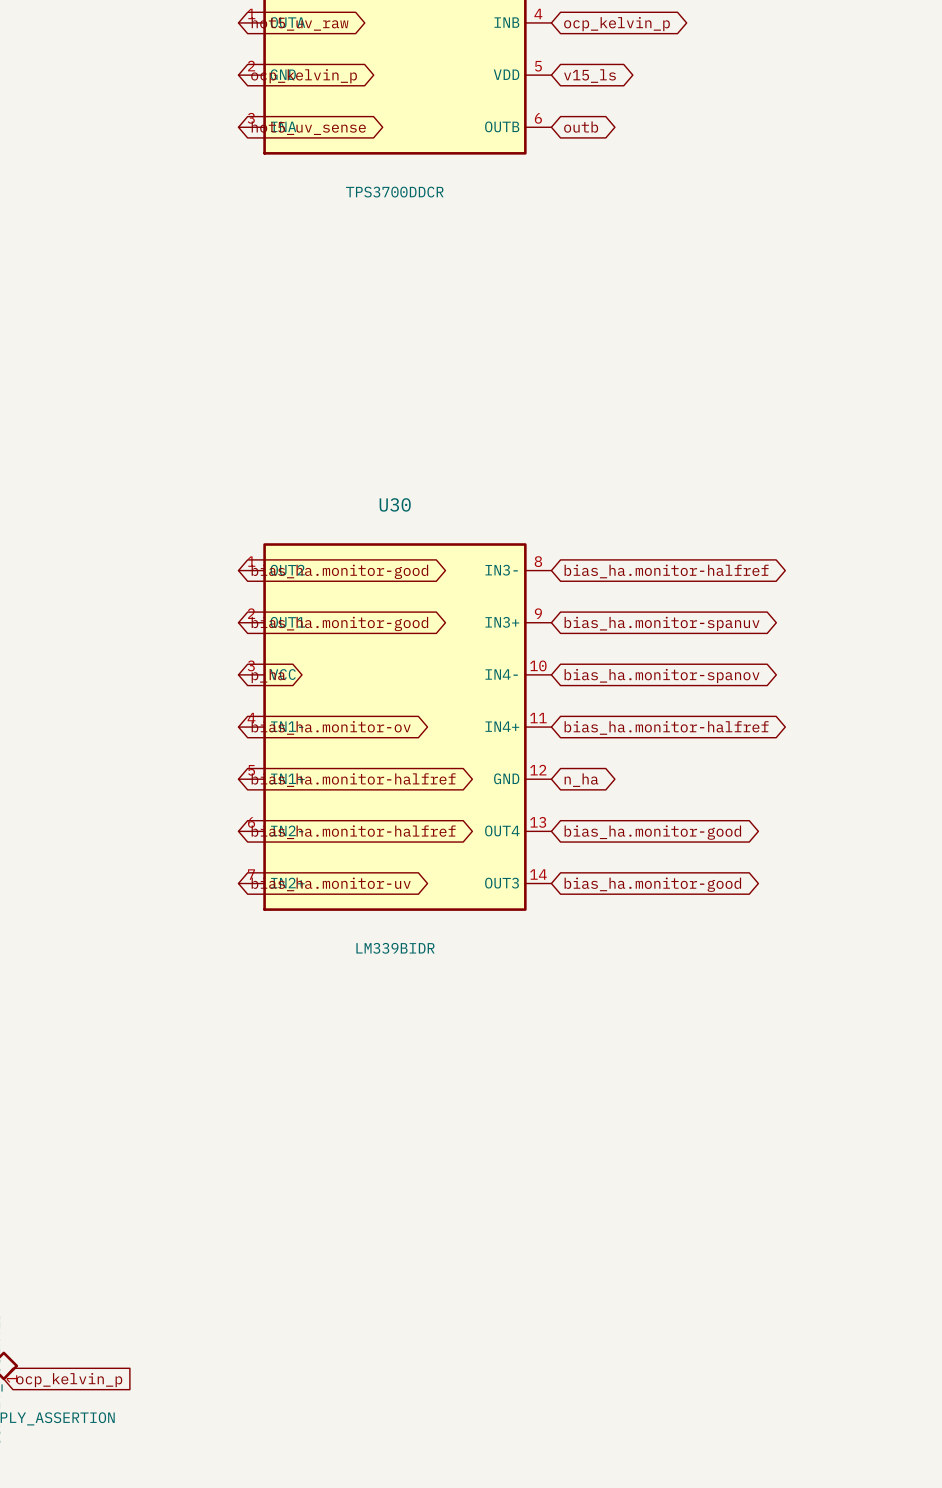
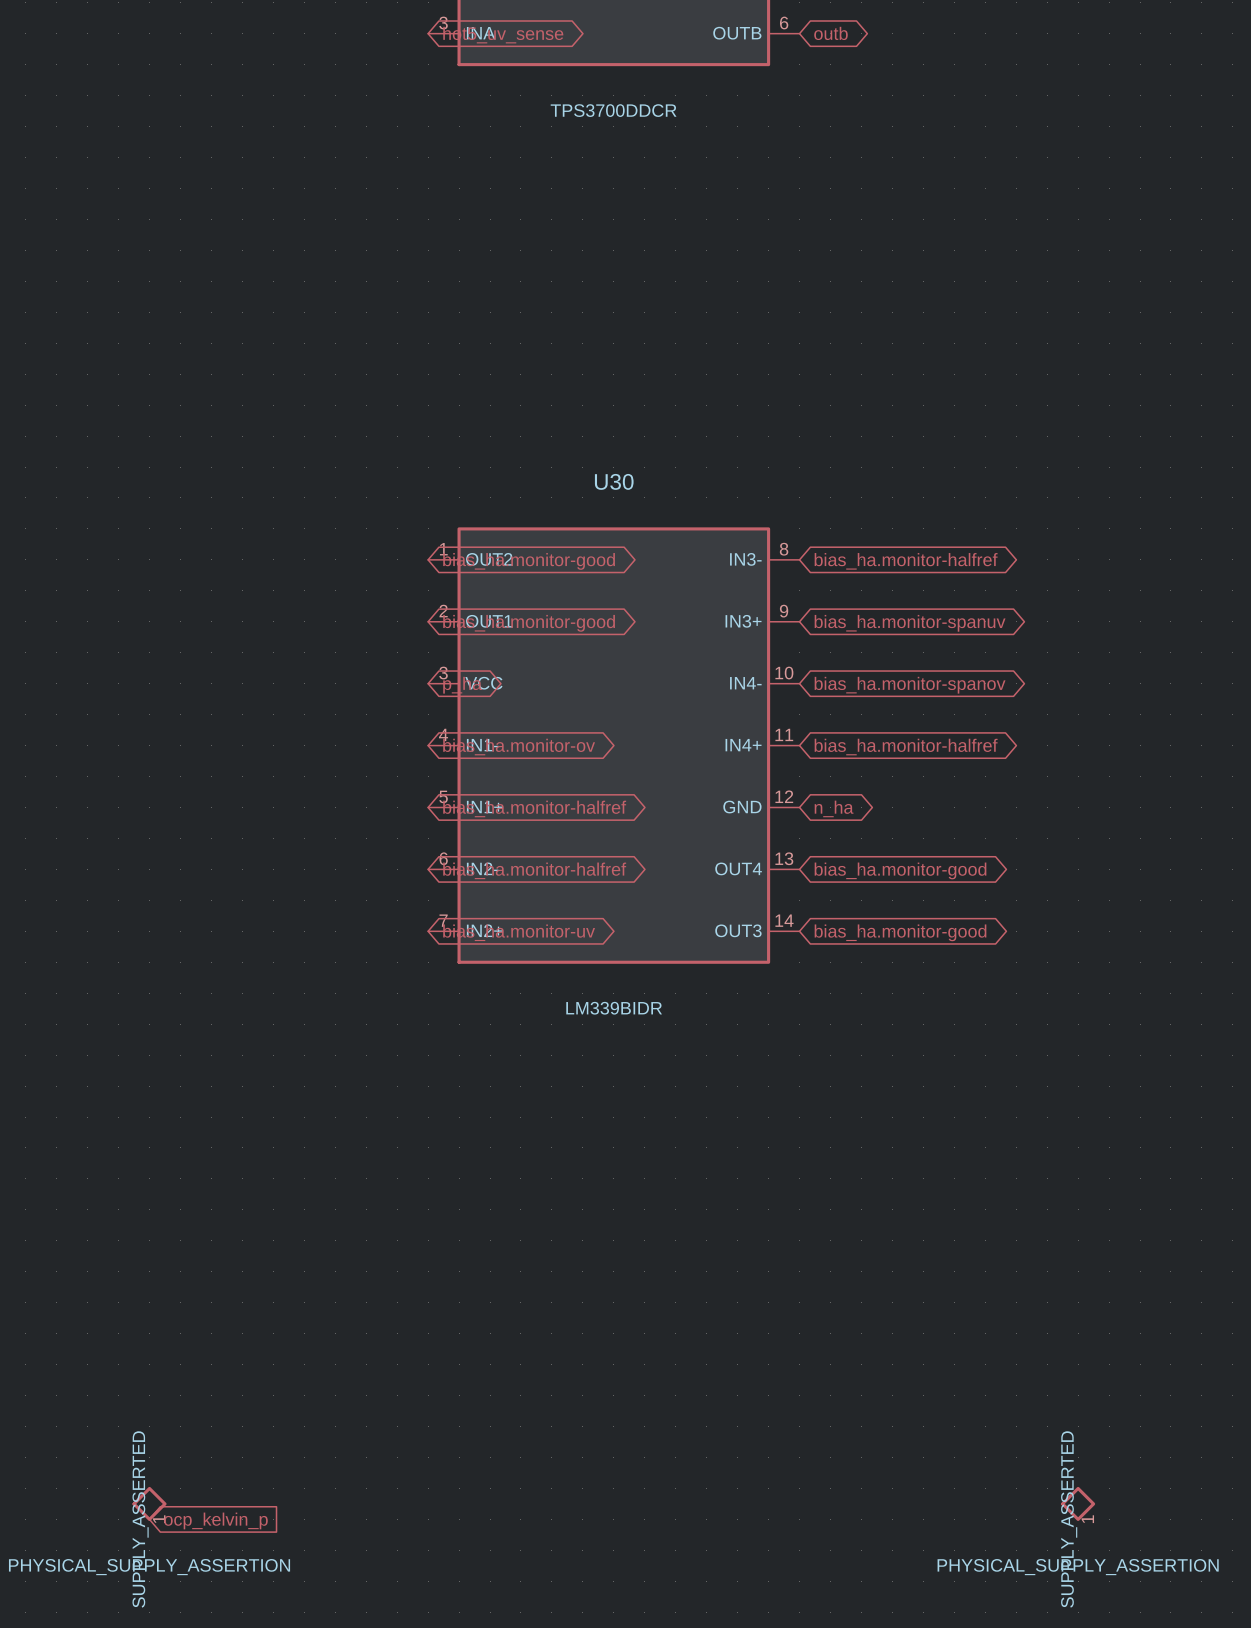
power symbol: none -> PHYSICAL_SUPPLY_ASSERTION (1078, 1503)

